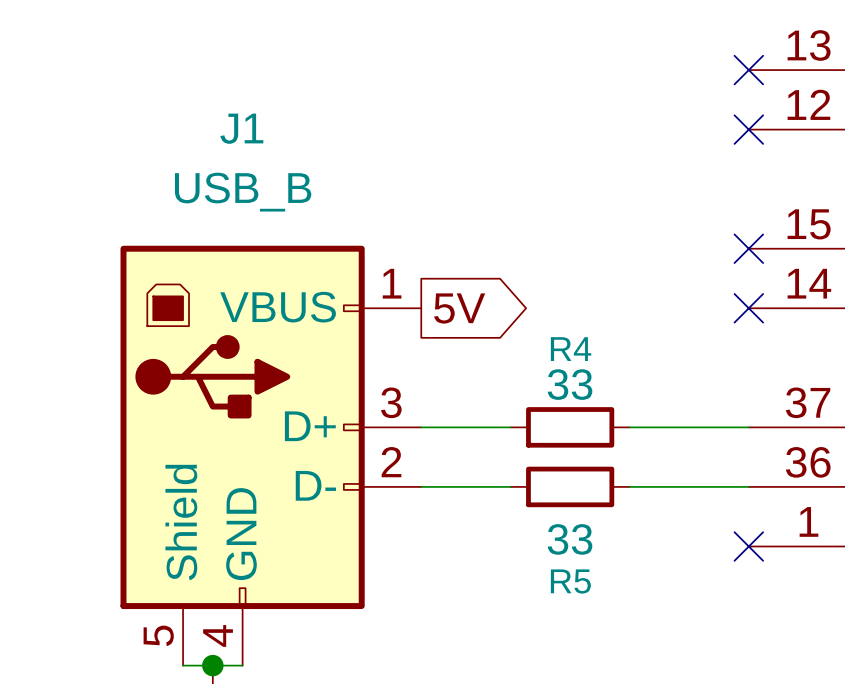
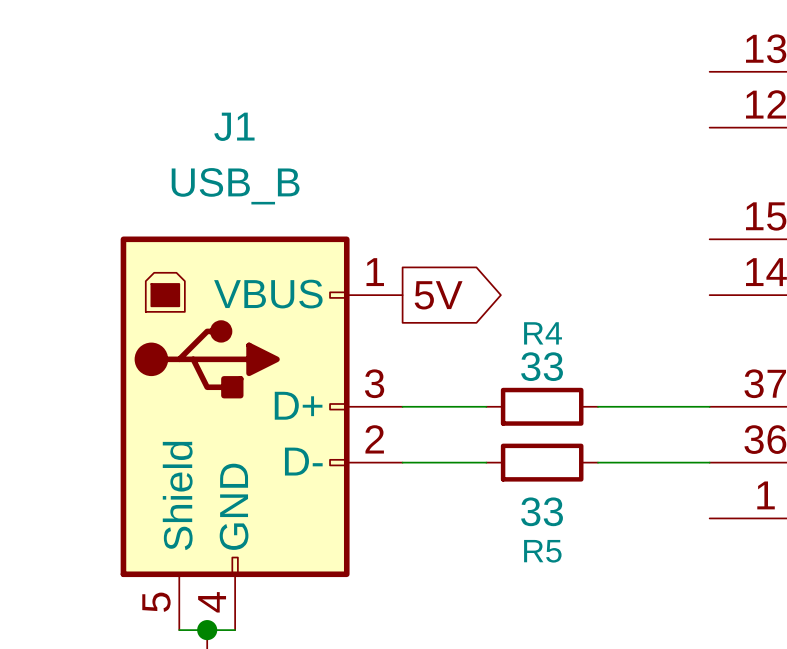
no-connect mark: (748, 70) -> none
no-connect mark: (748, 129) -> none
no-connect mark: (748, 248) -> none
no-connect mark: (748, 308) -> none
no-connect mark: (748, 546) -> none

